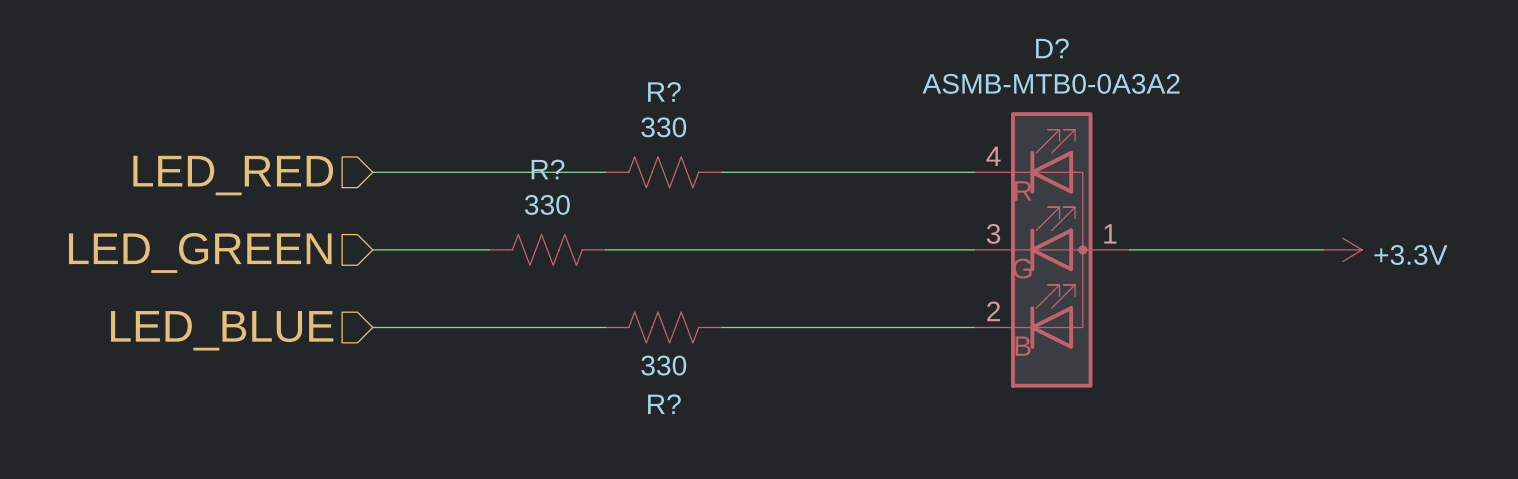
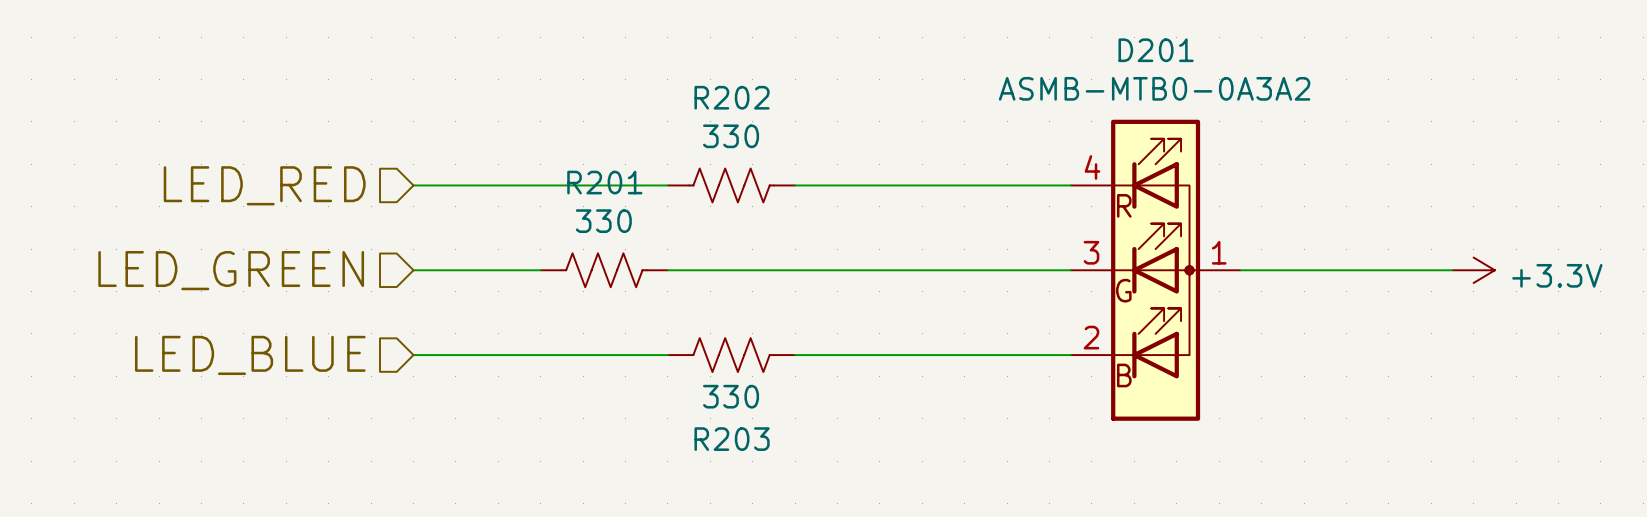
D? name: D? (1052, 48) -> D201 (1156, 50)
R? name: R? (664, 91) -> R202 (732, 97)
R? name: R? (548, 169) -> R201 (604, 182)
R? name: R? (664, 404) -> R203 (732, 439)

